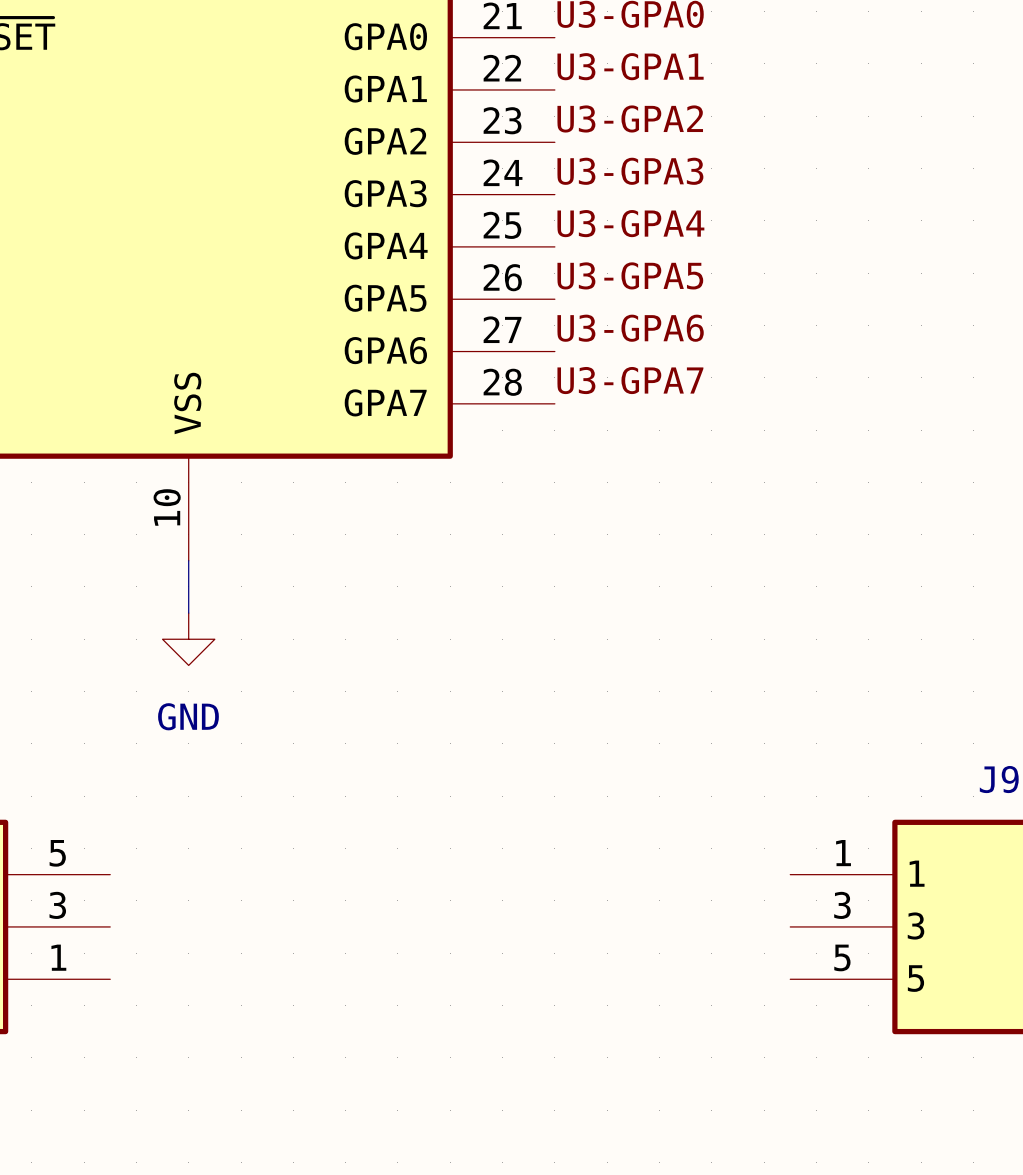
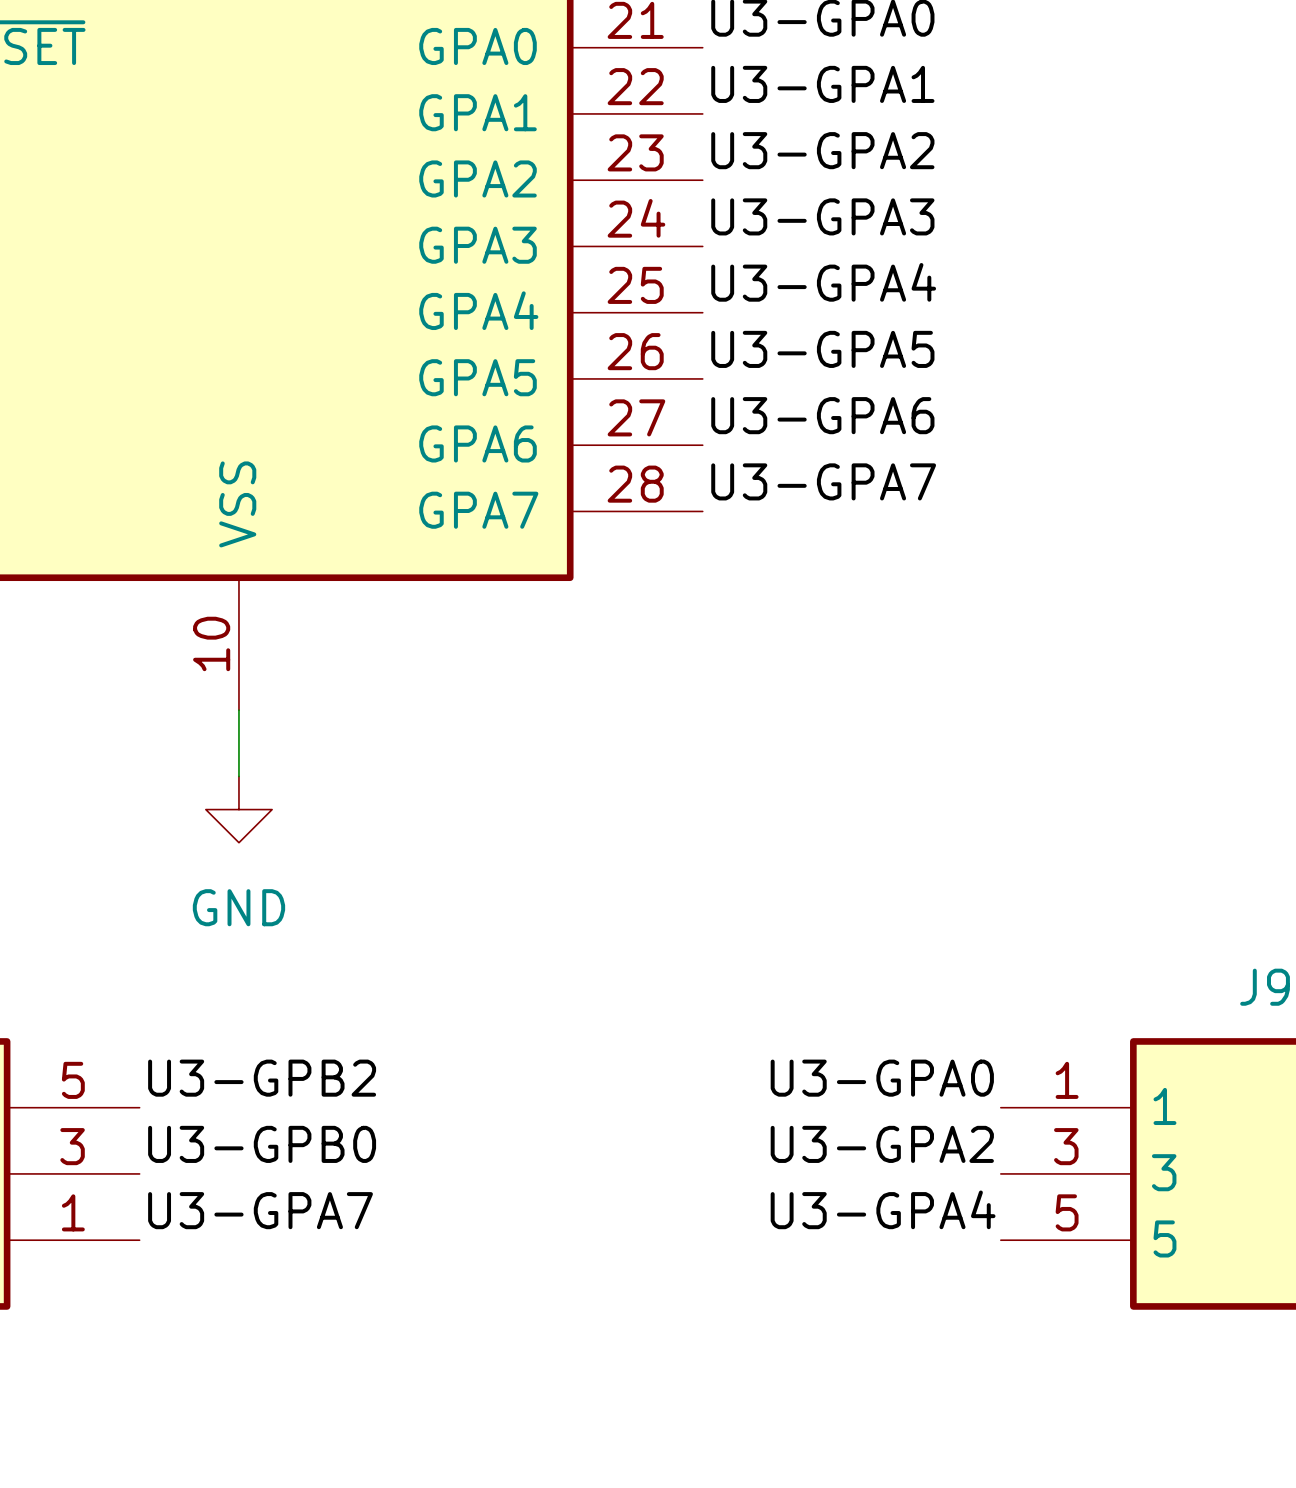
label: none -> U3-GPB2 (262, 1078)
label: none -> U3-GPA0 (882, 1078)
label: none -> U3-GPB0 (262, 1144)
label: none -> U3-GPA2 (882, 1144)
label: none -> U3-GPA7 (260, 1210)
label: none -> U3-GPA4 (883, 1209)

